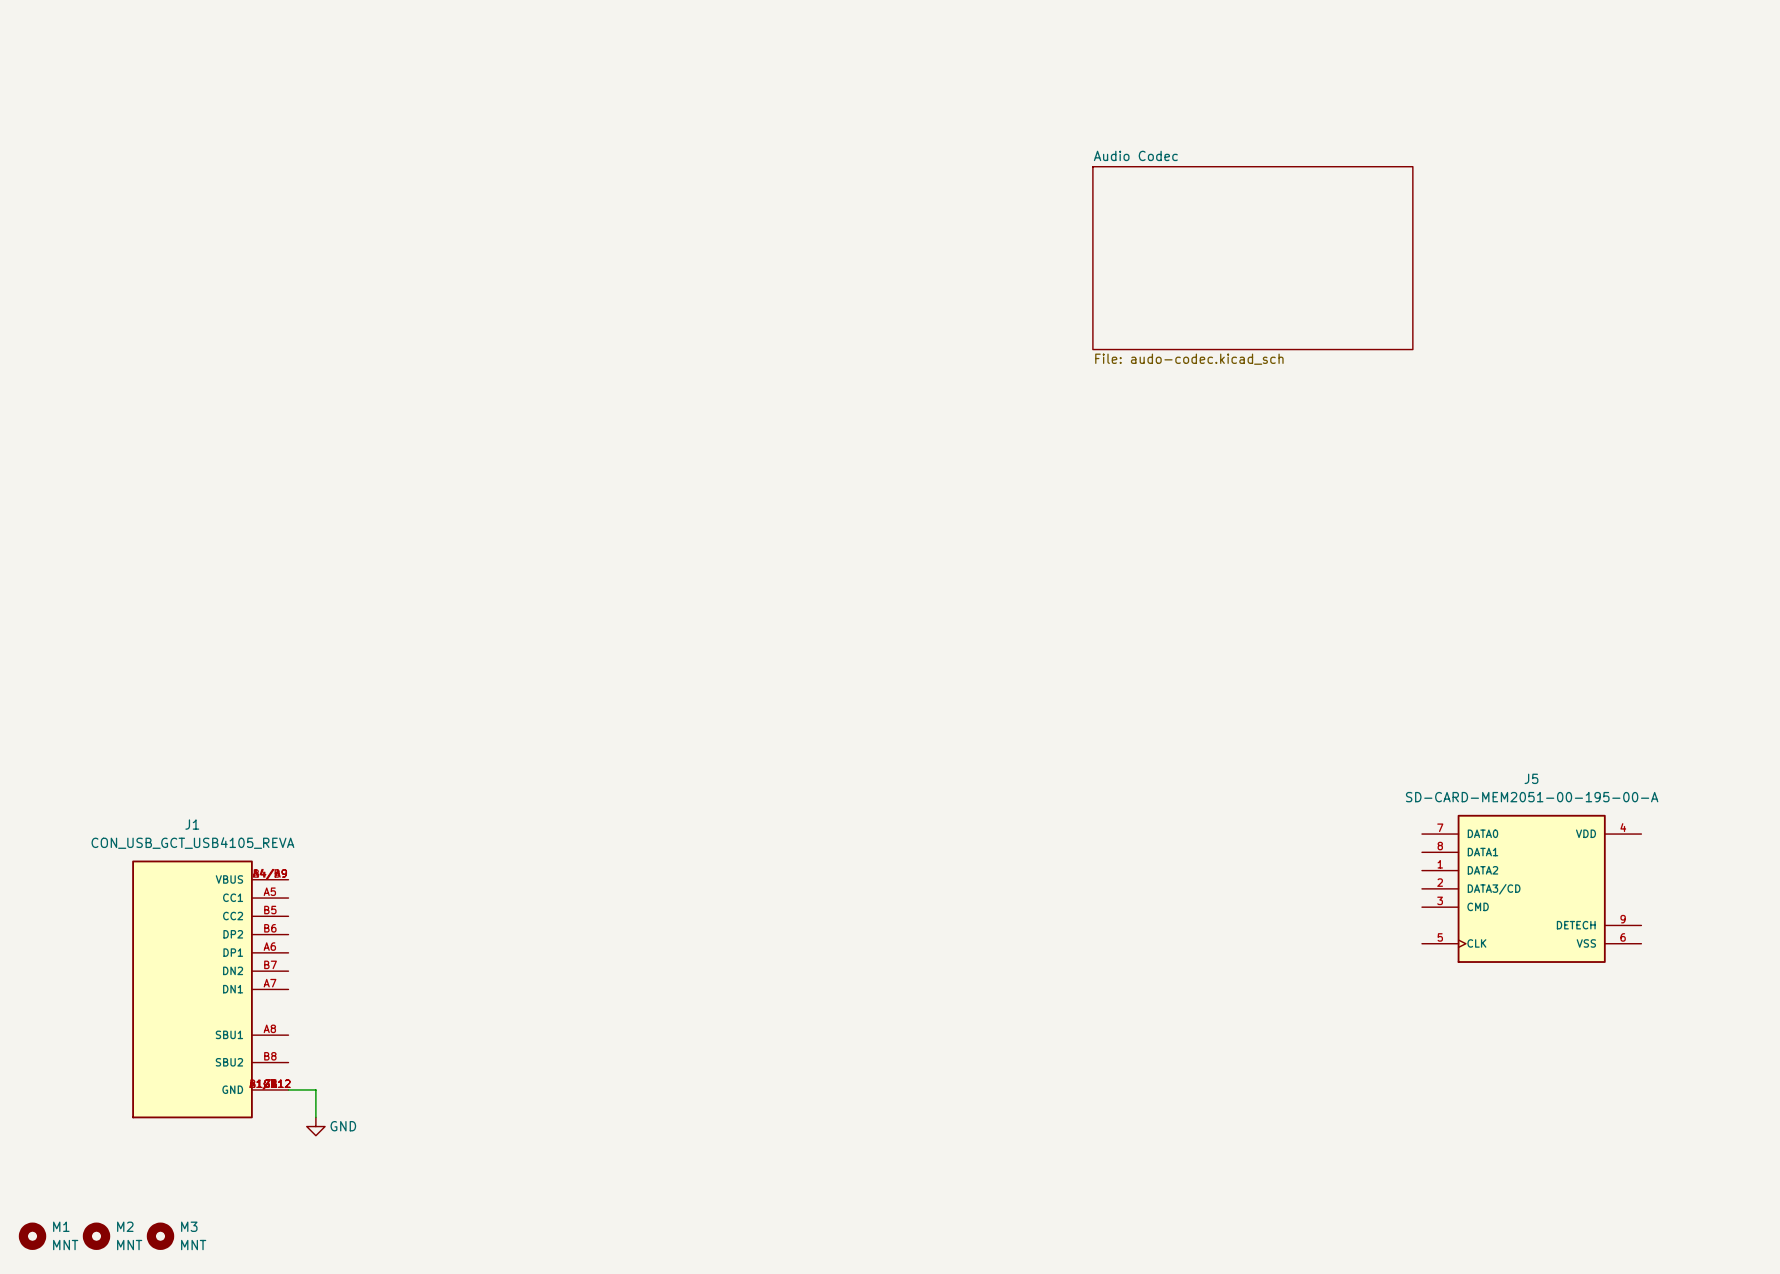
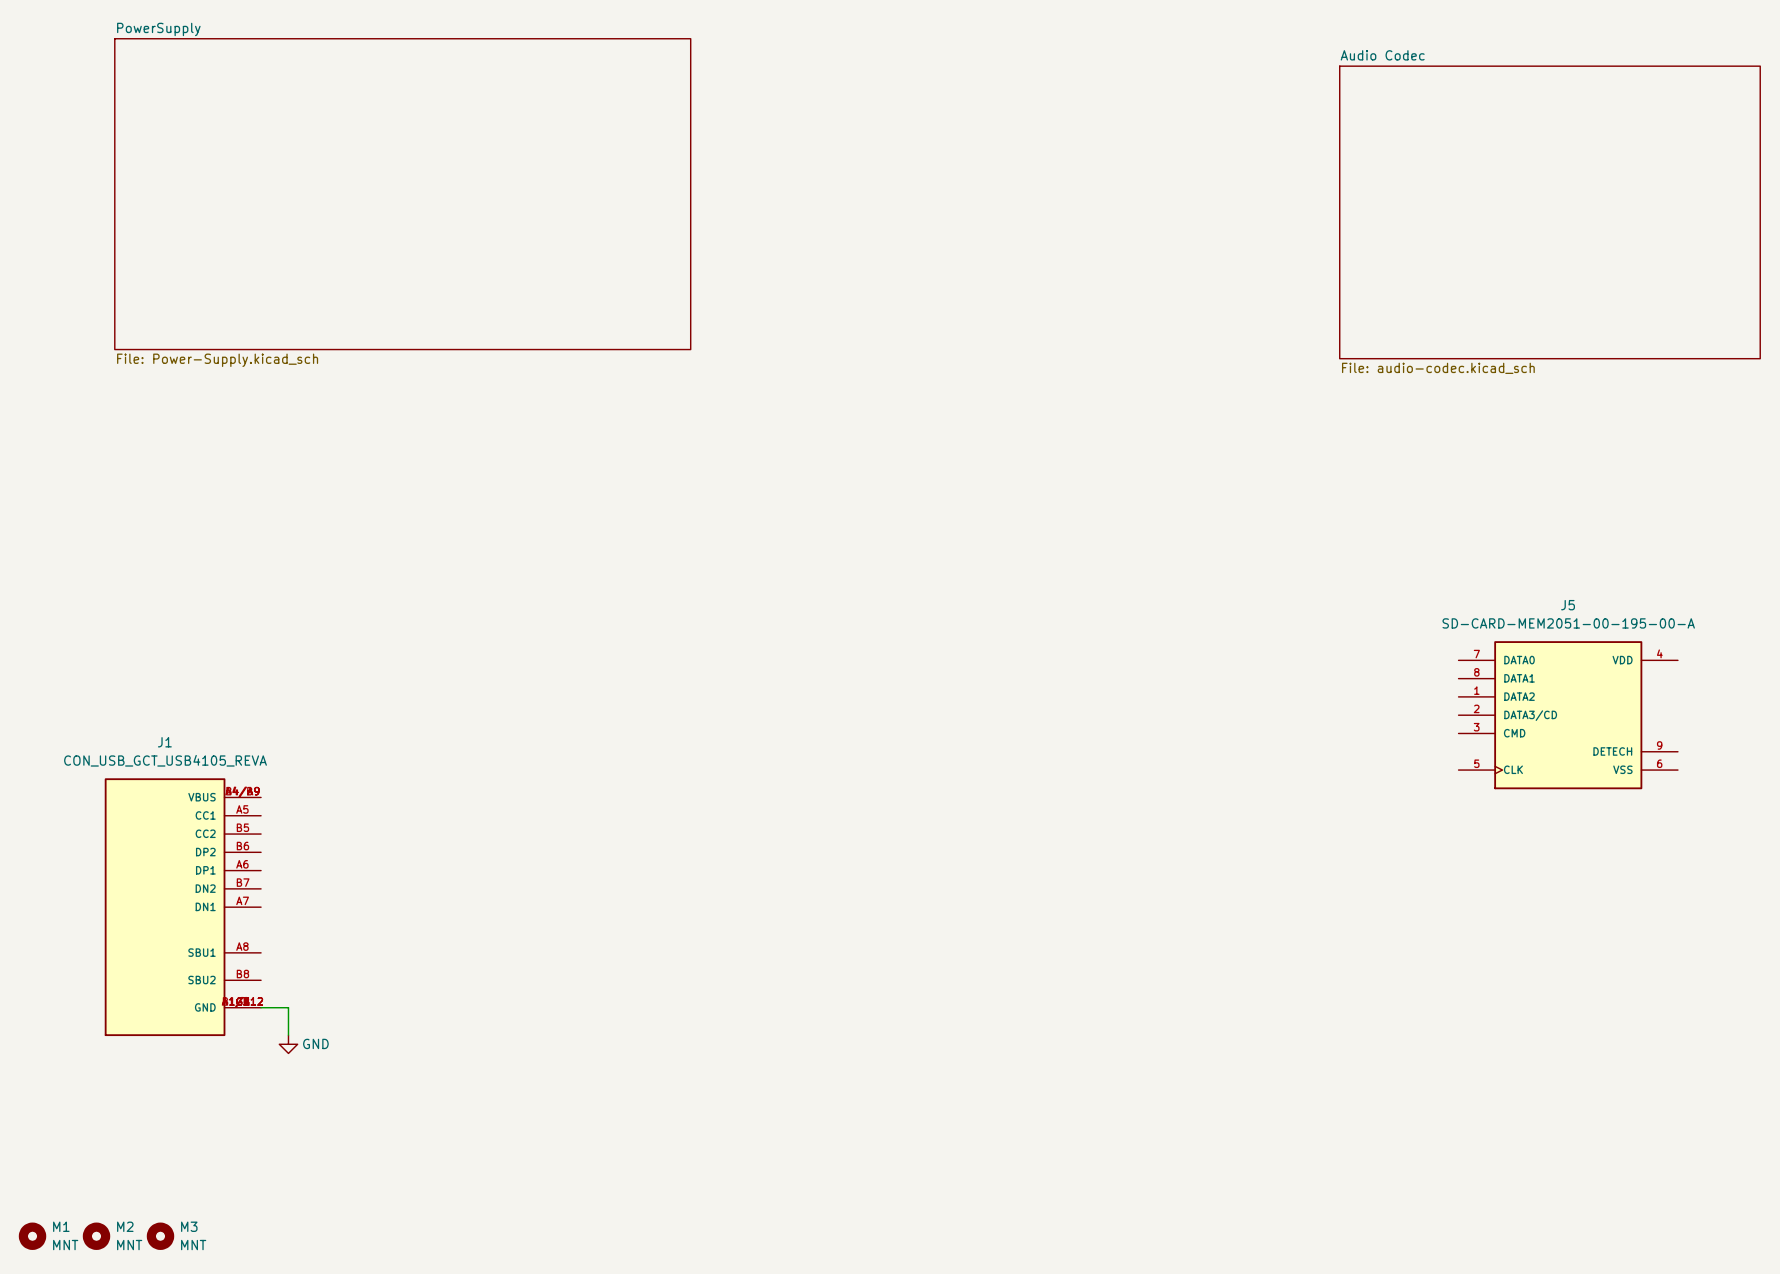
sheet PowerSupply: none -> File: Power-Supply.kicad_sch (402, 194)
sheet Audio Codec: none -> File: audio-codec.kicad_sch (1549, 212)
sheet Audio Codec: File: audo-codec.kicad_sch (1252, 258) -> none
J5 position: (1531, 888) -> (1568, 715)
J1 position: (210, 989) -> (182, 907)
wire: (288, 1089) (315, 1089) (315, 1117) -> (261, 1007) (288, 1007) (288, 1035)
power symbol position: GND (315, 1126) -> GND (288, 1044)

